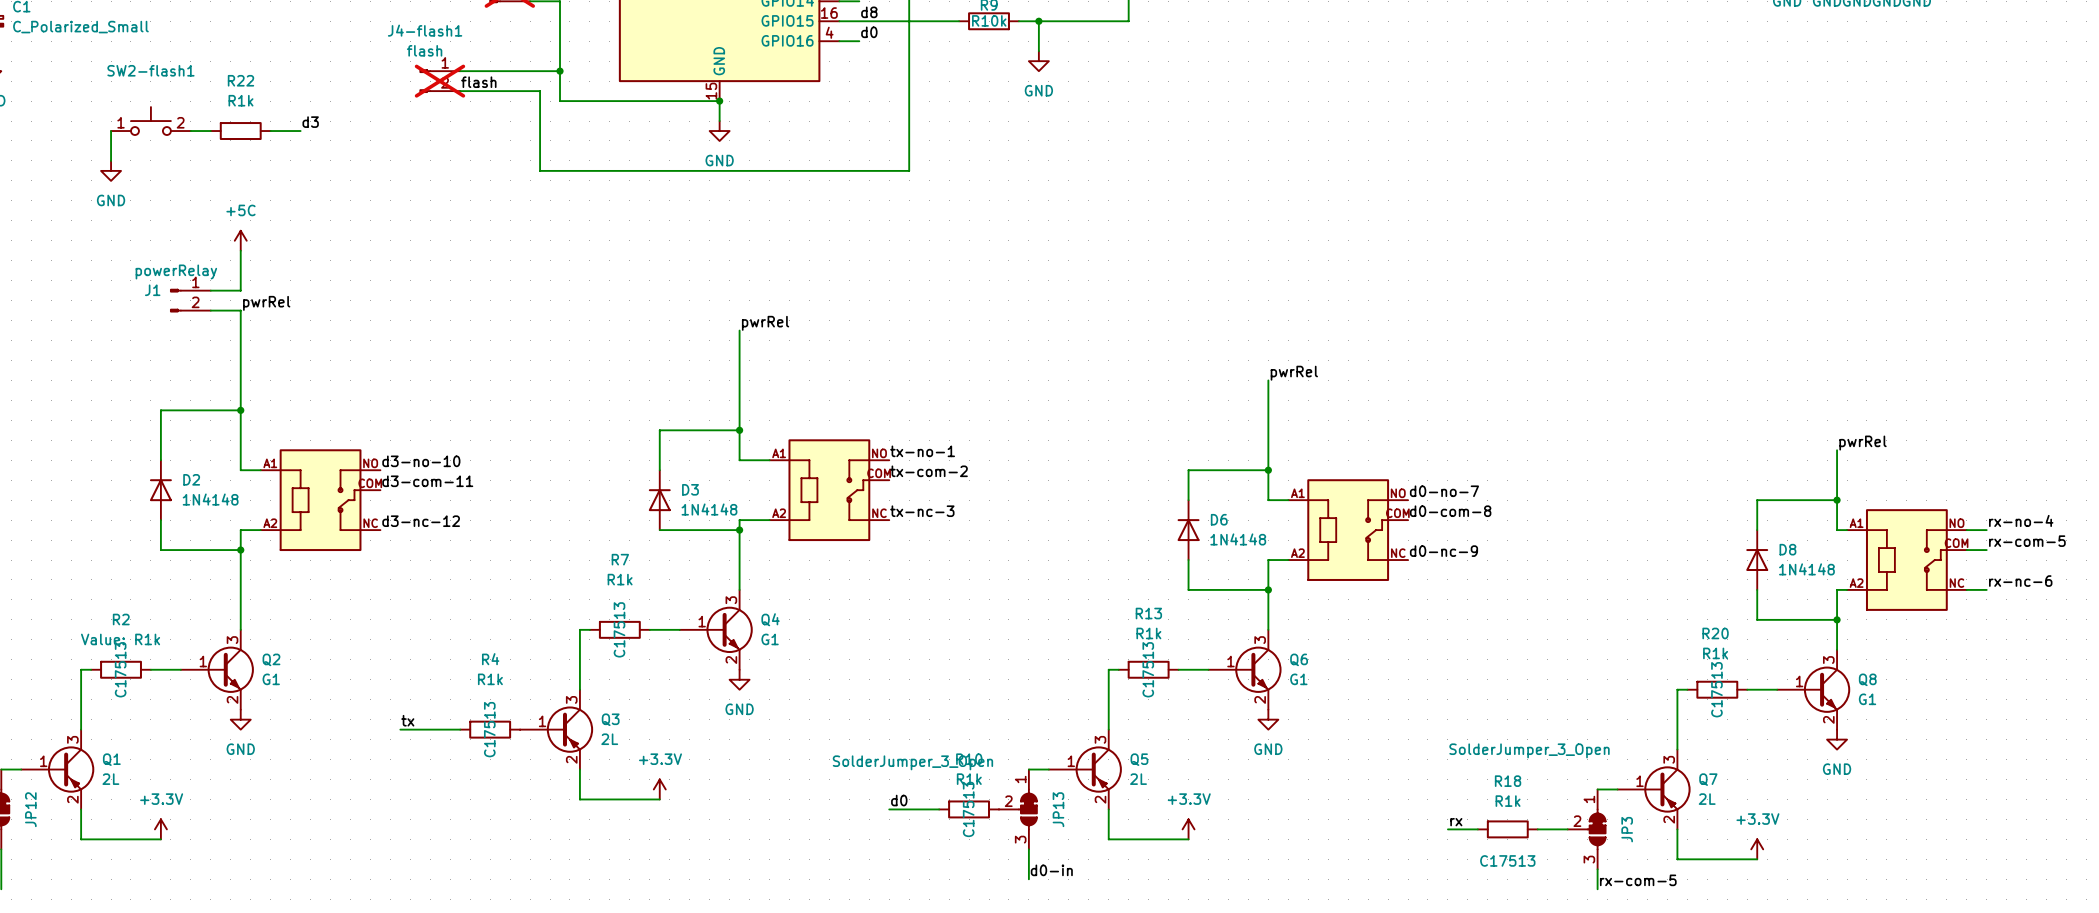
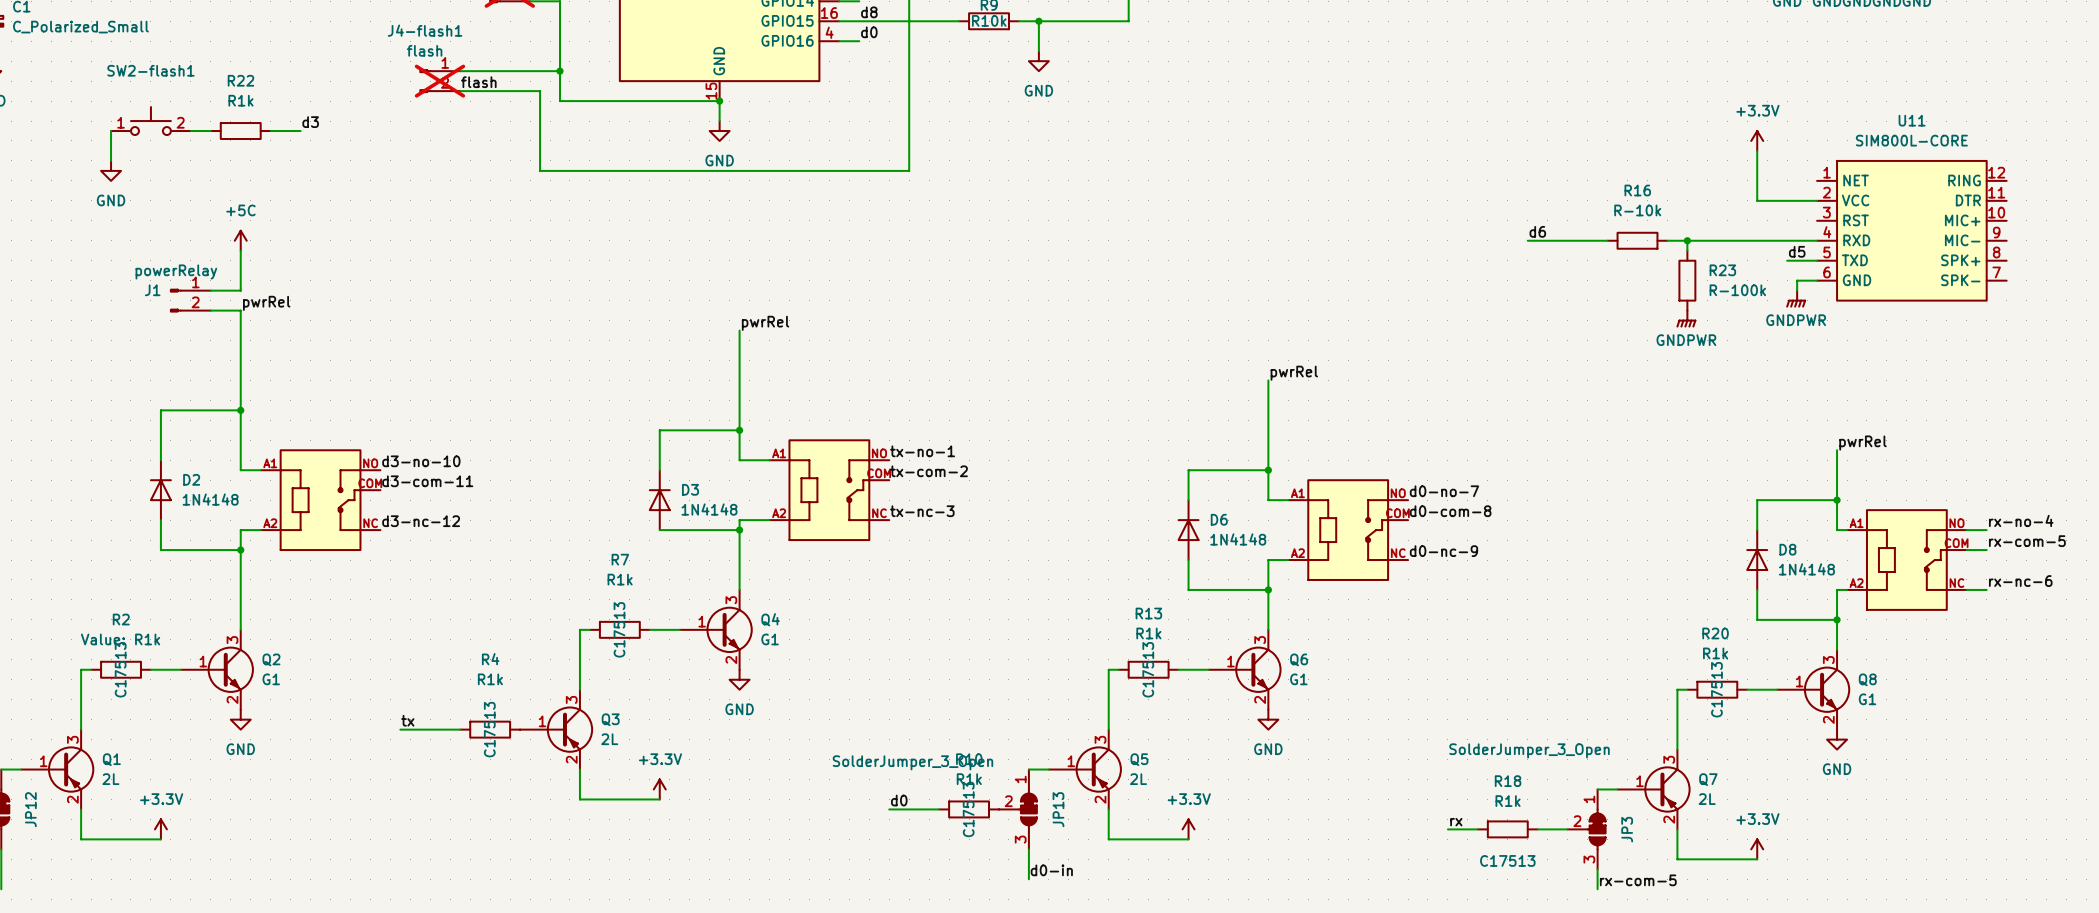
power symbol: none -> +3.3V (1757, 140)
wire: none -> (1757, 150) (1757, 200) (1817, 200)
U11: none -> SIM800L-CORE (1911, 230)
label: none -> d6 (1537, 231)
wire: none -> (1527, 240) (1607, 240)
R16: none -> R-10k (1637, 240)
wire: none -> (1667, 240) (1817, 240)
wire: none -> (1687, 240) (1687, 250)
junction: none -> (1687, 240)
label: none -> d5 (1797, 251)
wire: none -> (1787, 260) (1817, 260)
R23: none -> R-100k (1687, 280)
wire: none -> (1817, 280) (1797, 280) (1797, 290)
power symbol: none -> GNDPWR (1796, 299)
power symbol: none -> GNDPWR (1686, 318)

